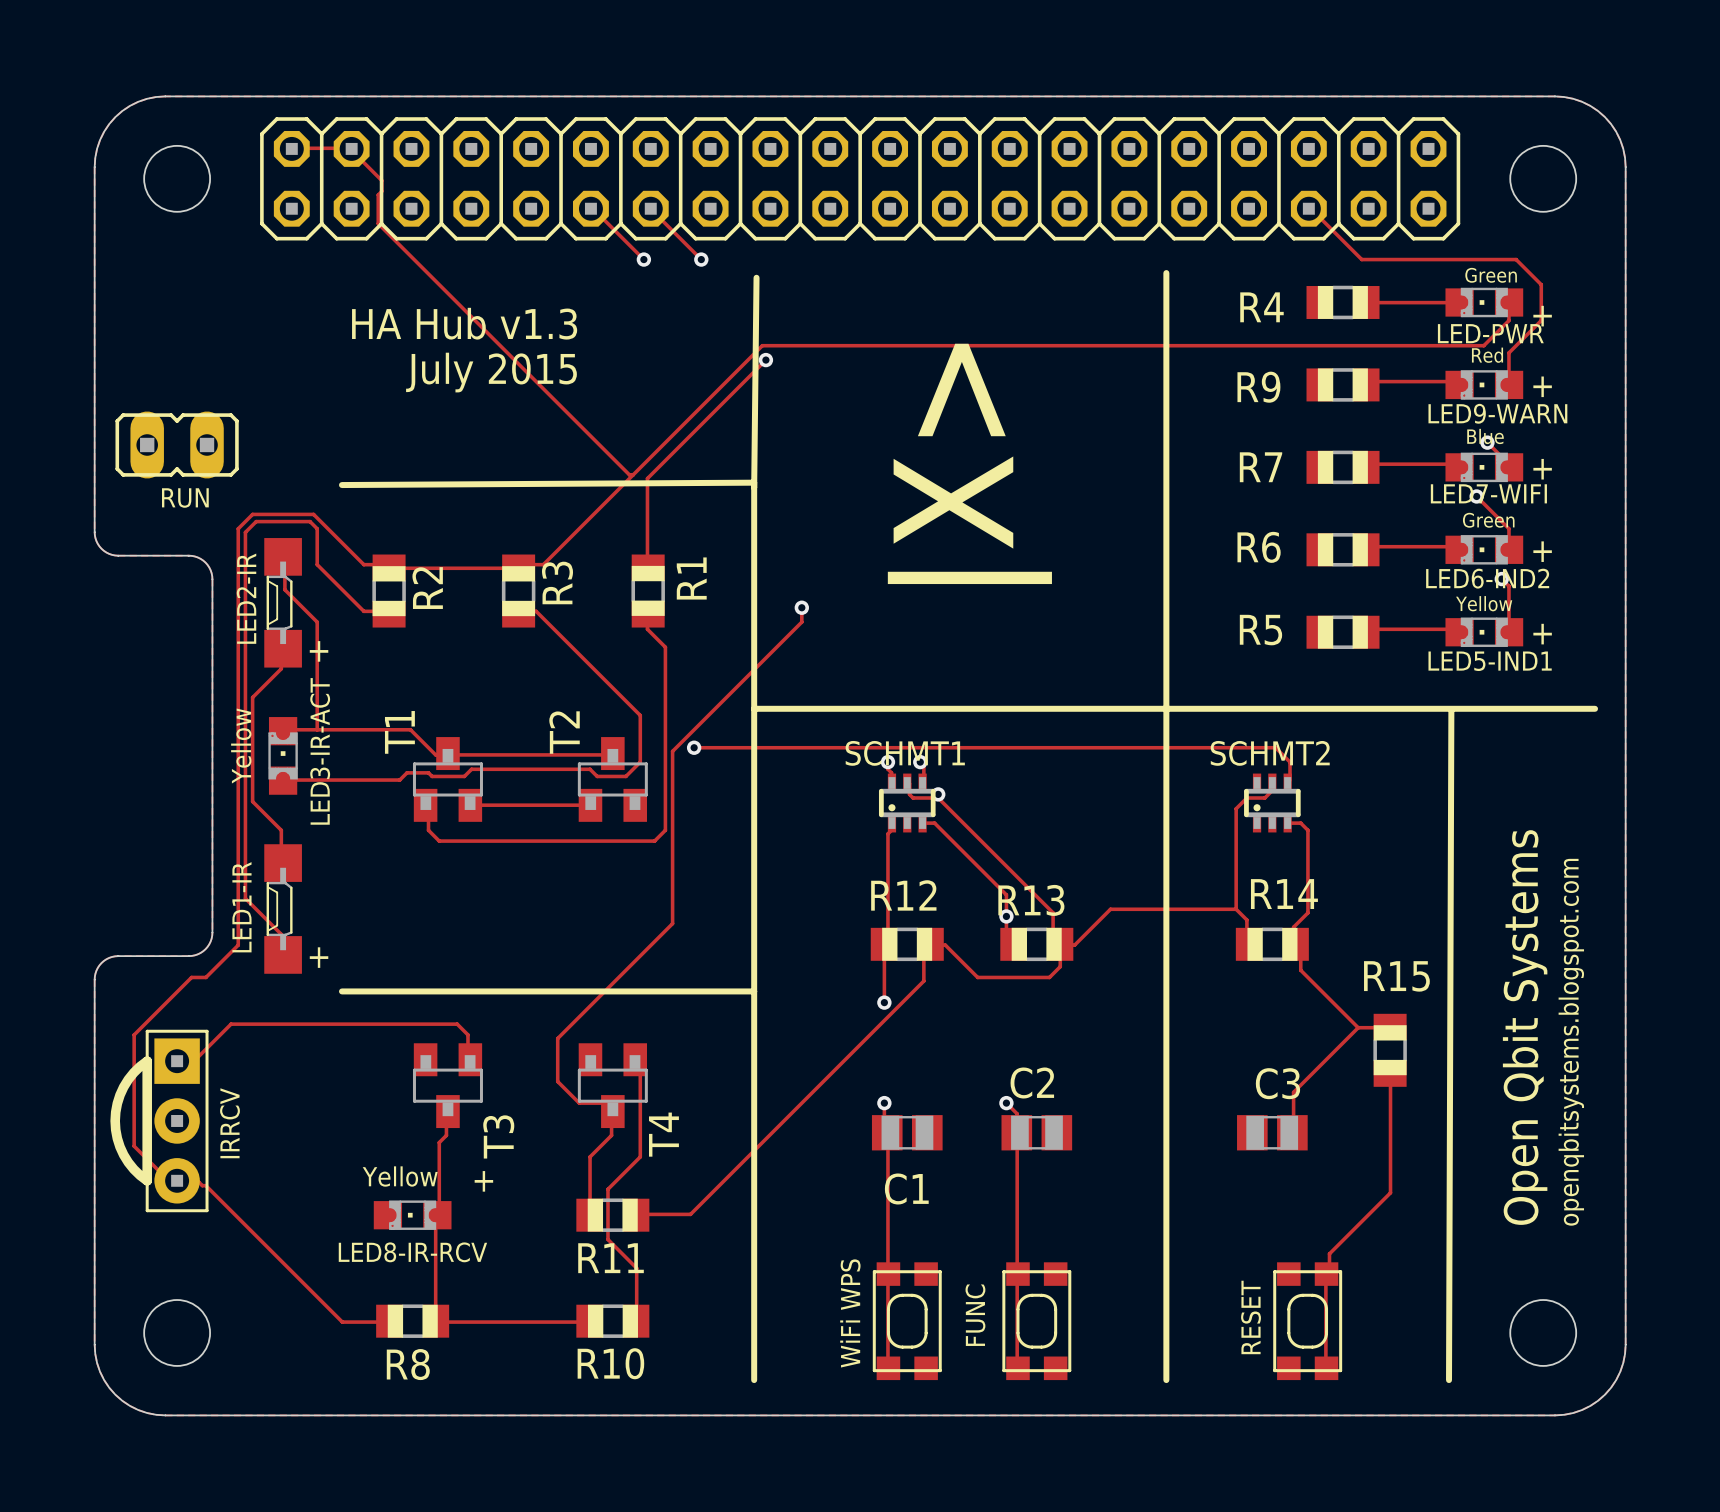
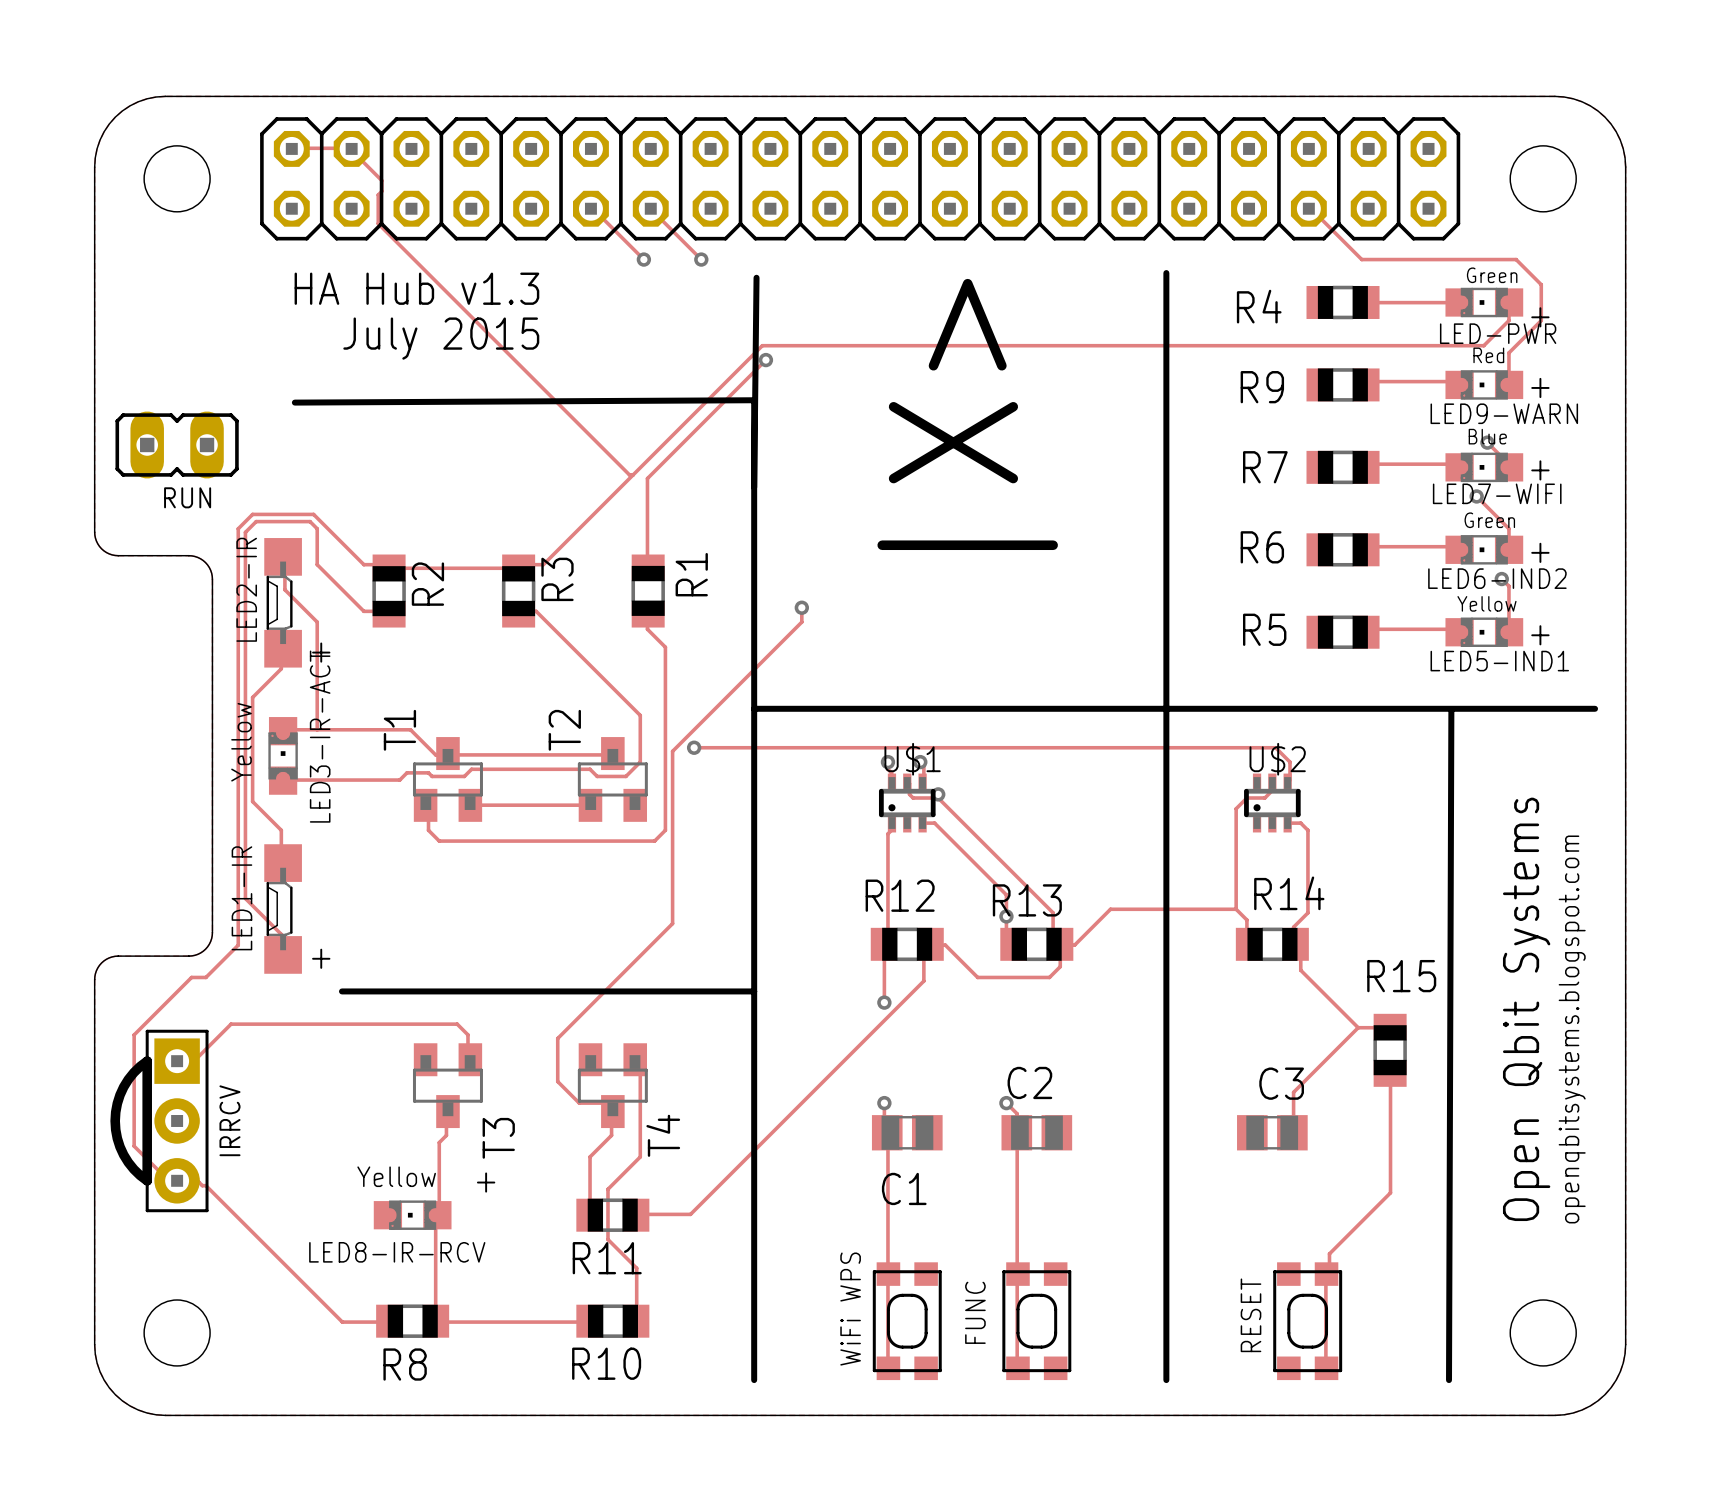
text position: HA Hub v1.3 (464, 323) -> HA Hub v1.3 (416, 288)
text position: July 2015 (491, 372) -> July 2015 (441, 338)
line: (754, 482) (341, 485) -> (754, 482) (754, 400) (294, 402)
SCHMT1 name: SCHMT1 (905, 753) -> U$1 (912, 759)
SCHMT2 name: SCHMT2 (1270, 753) -> U$2 (1277, 759)

